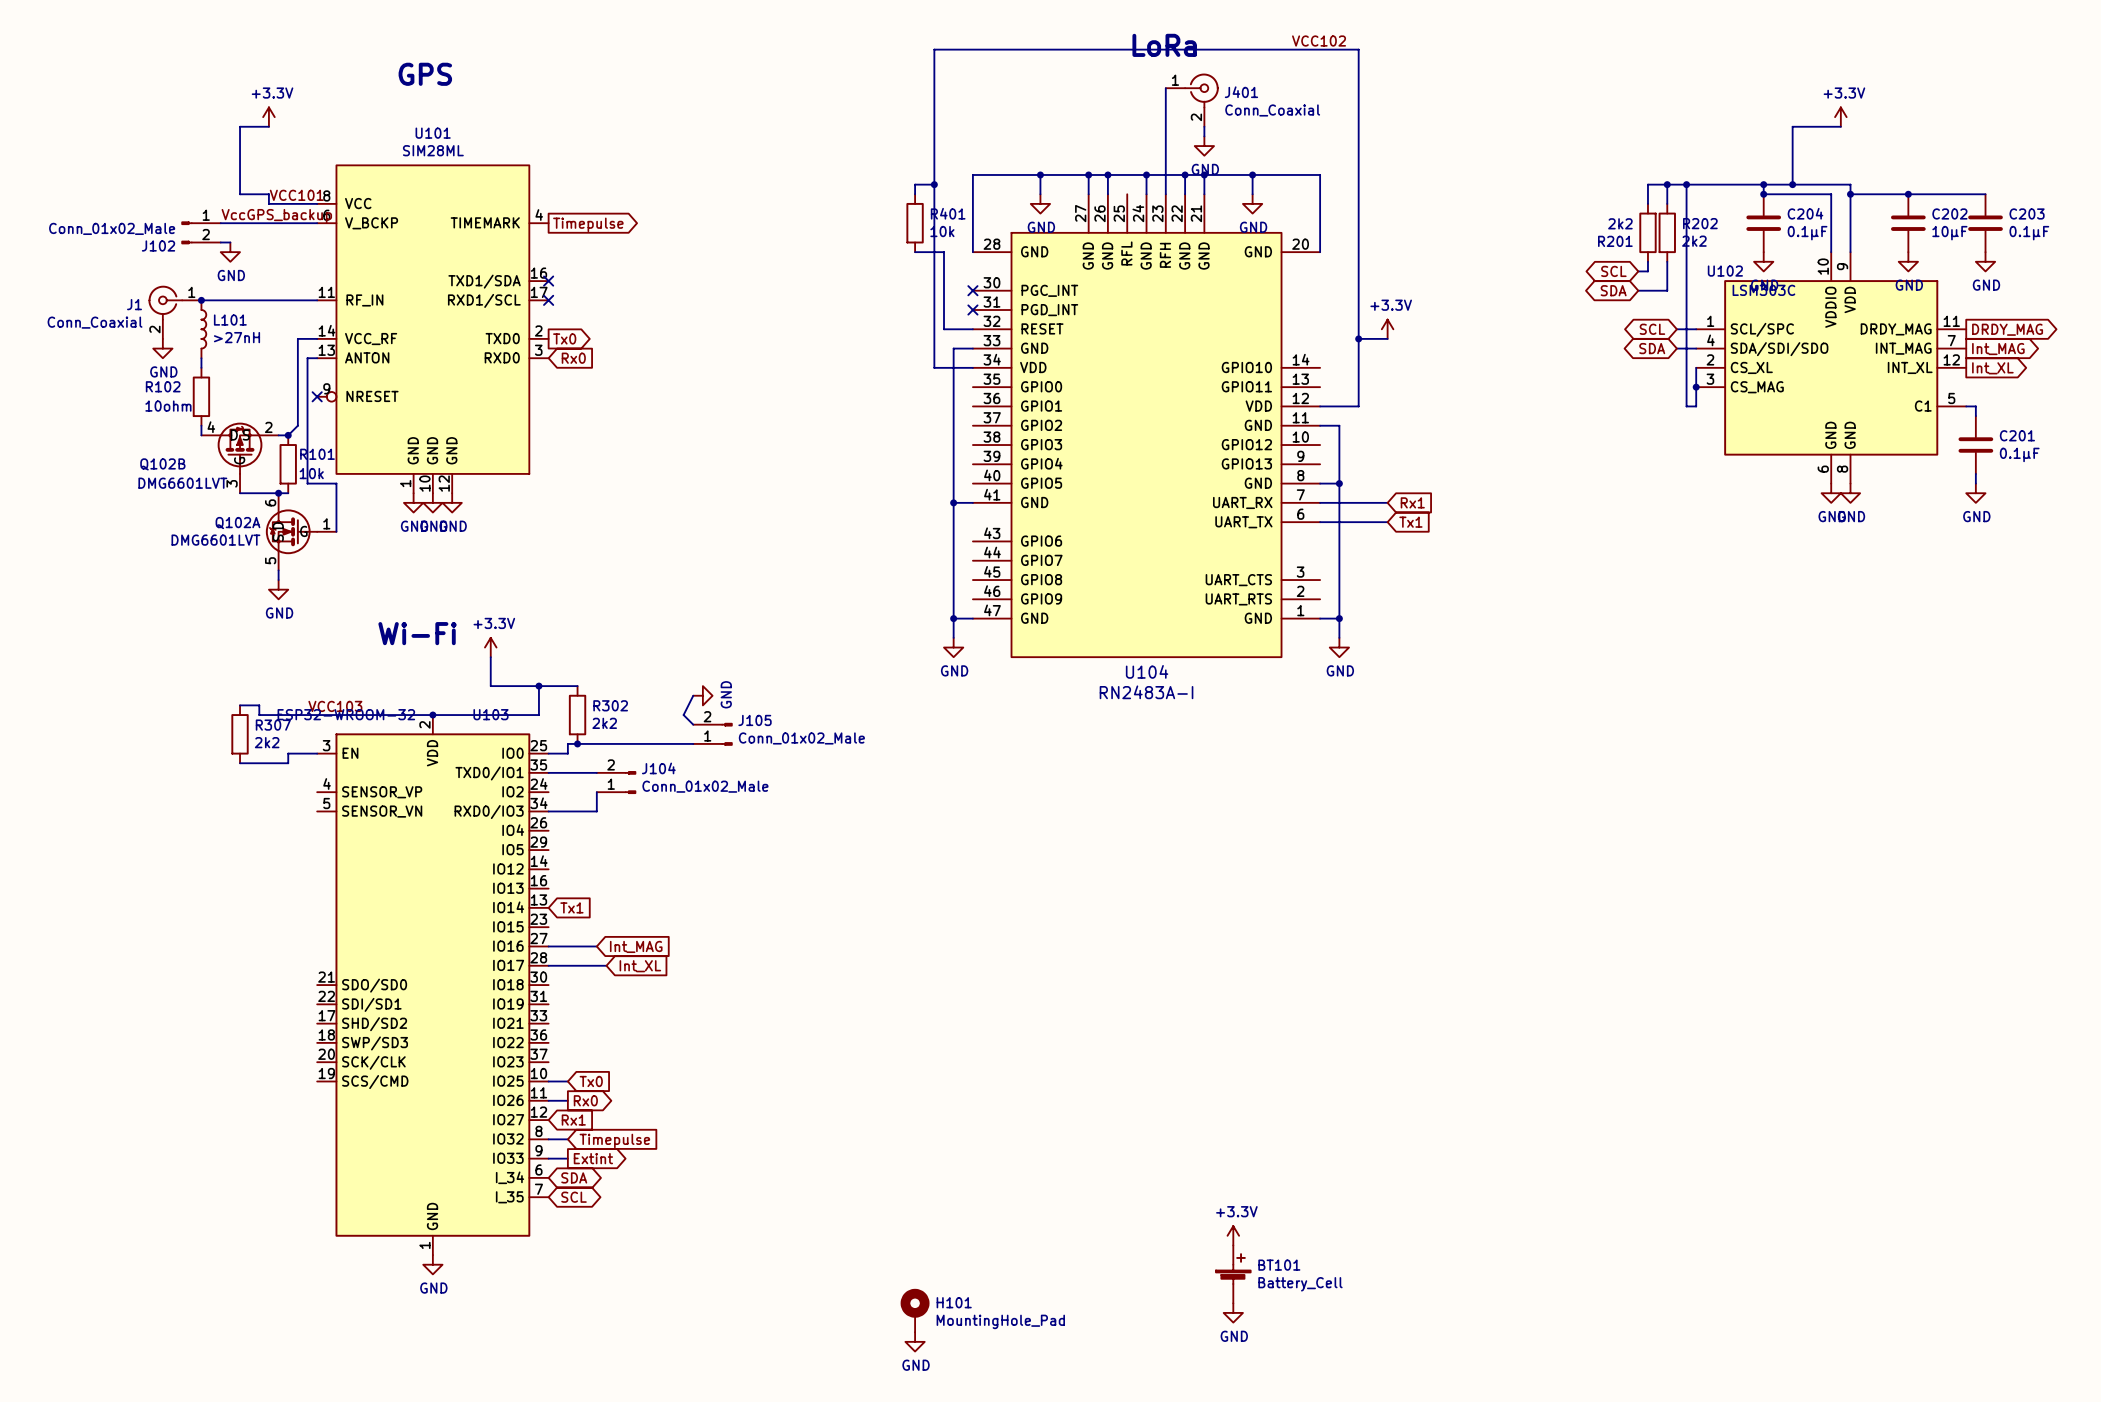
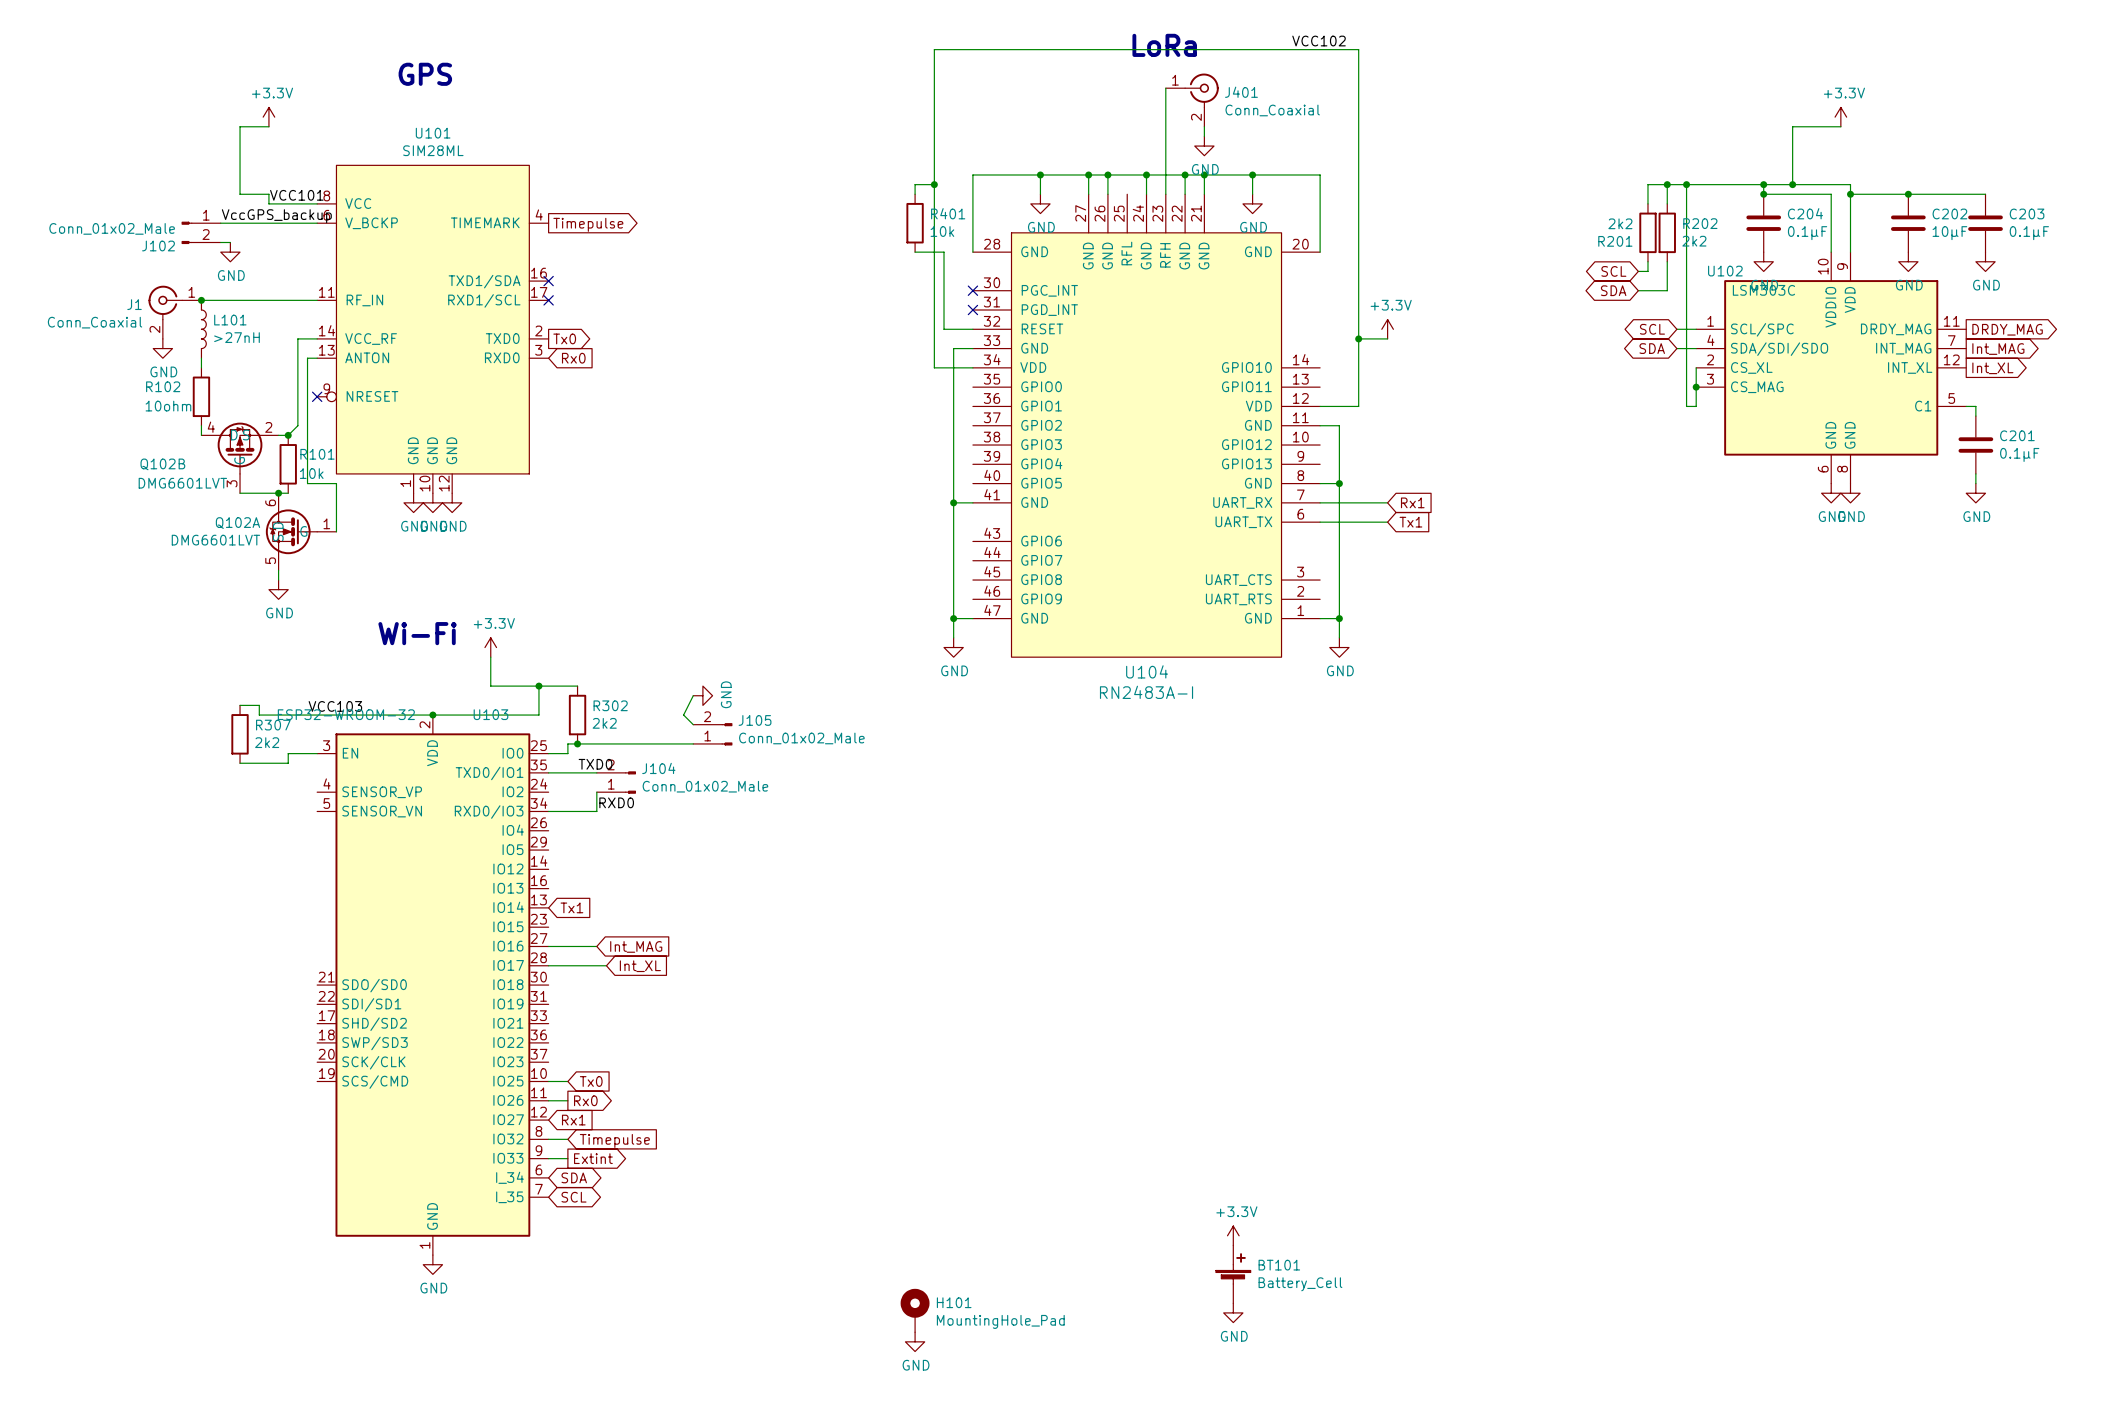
label: none -> TXD0 (595, 764)
label: none -> RXD0 (616, 802)

